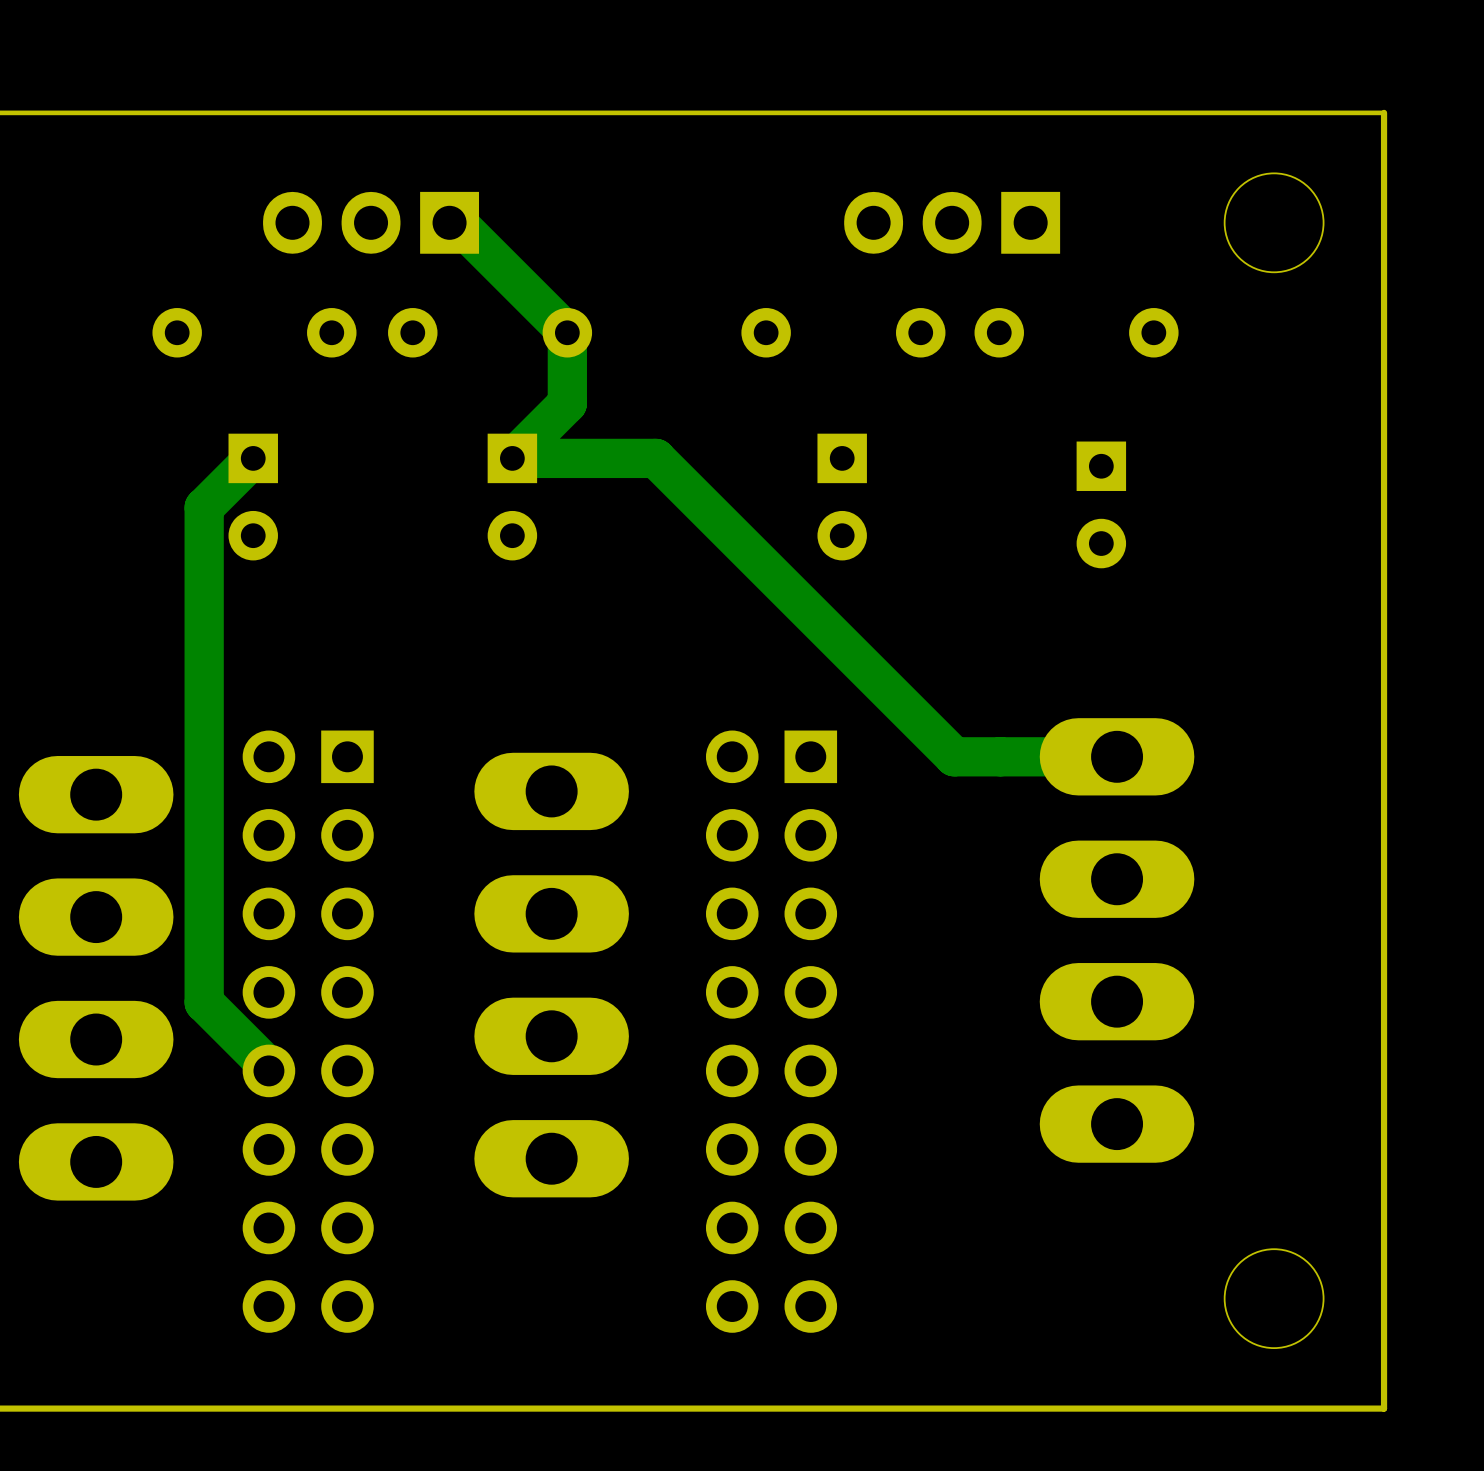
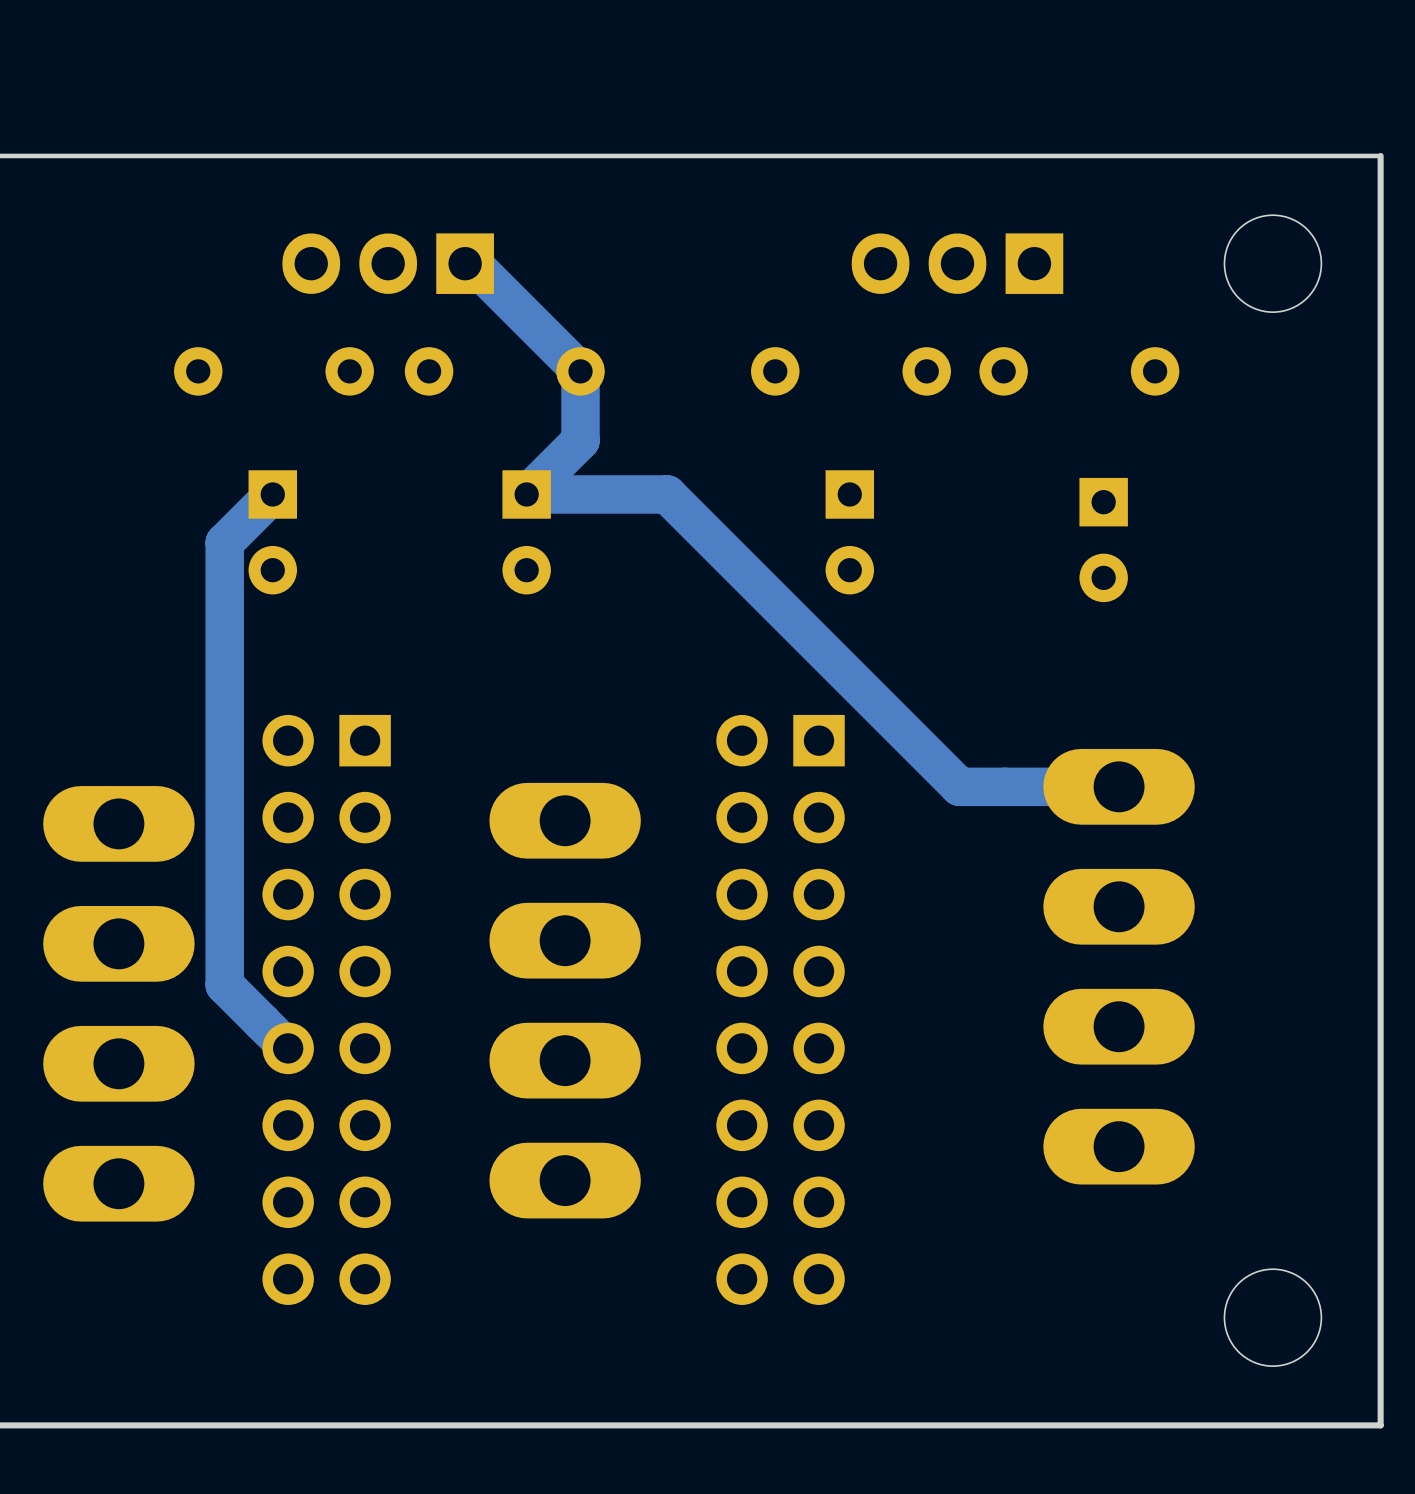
track: (204, 959) (204, 1002) (268, 1067) (268, 1070) -> (224, 984) (288, 1048)
part position: (308, 1031) -> (326, 1009)
part position: (771, 1031) -> (780, 1009)

